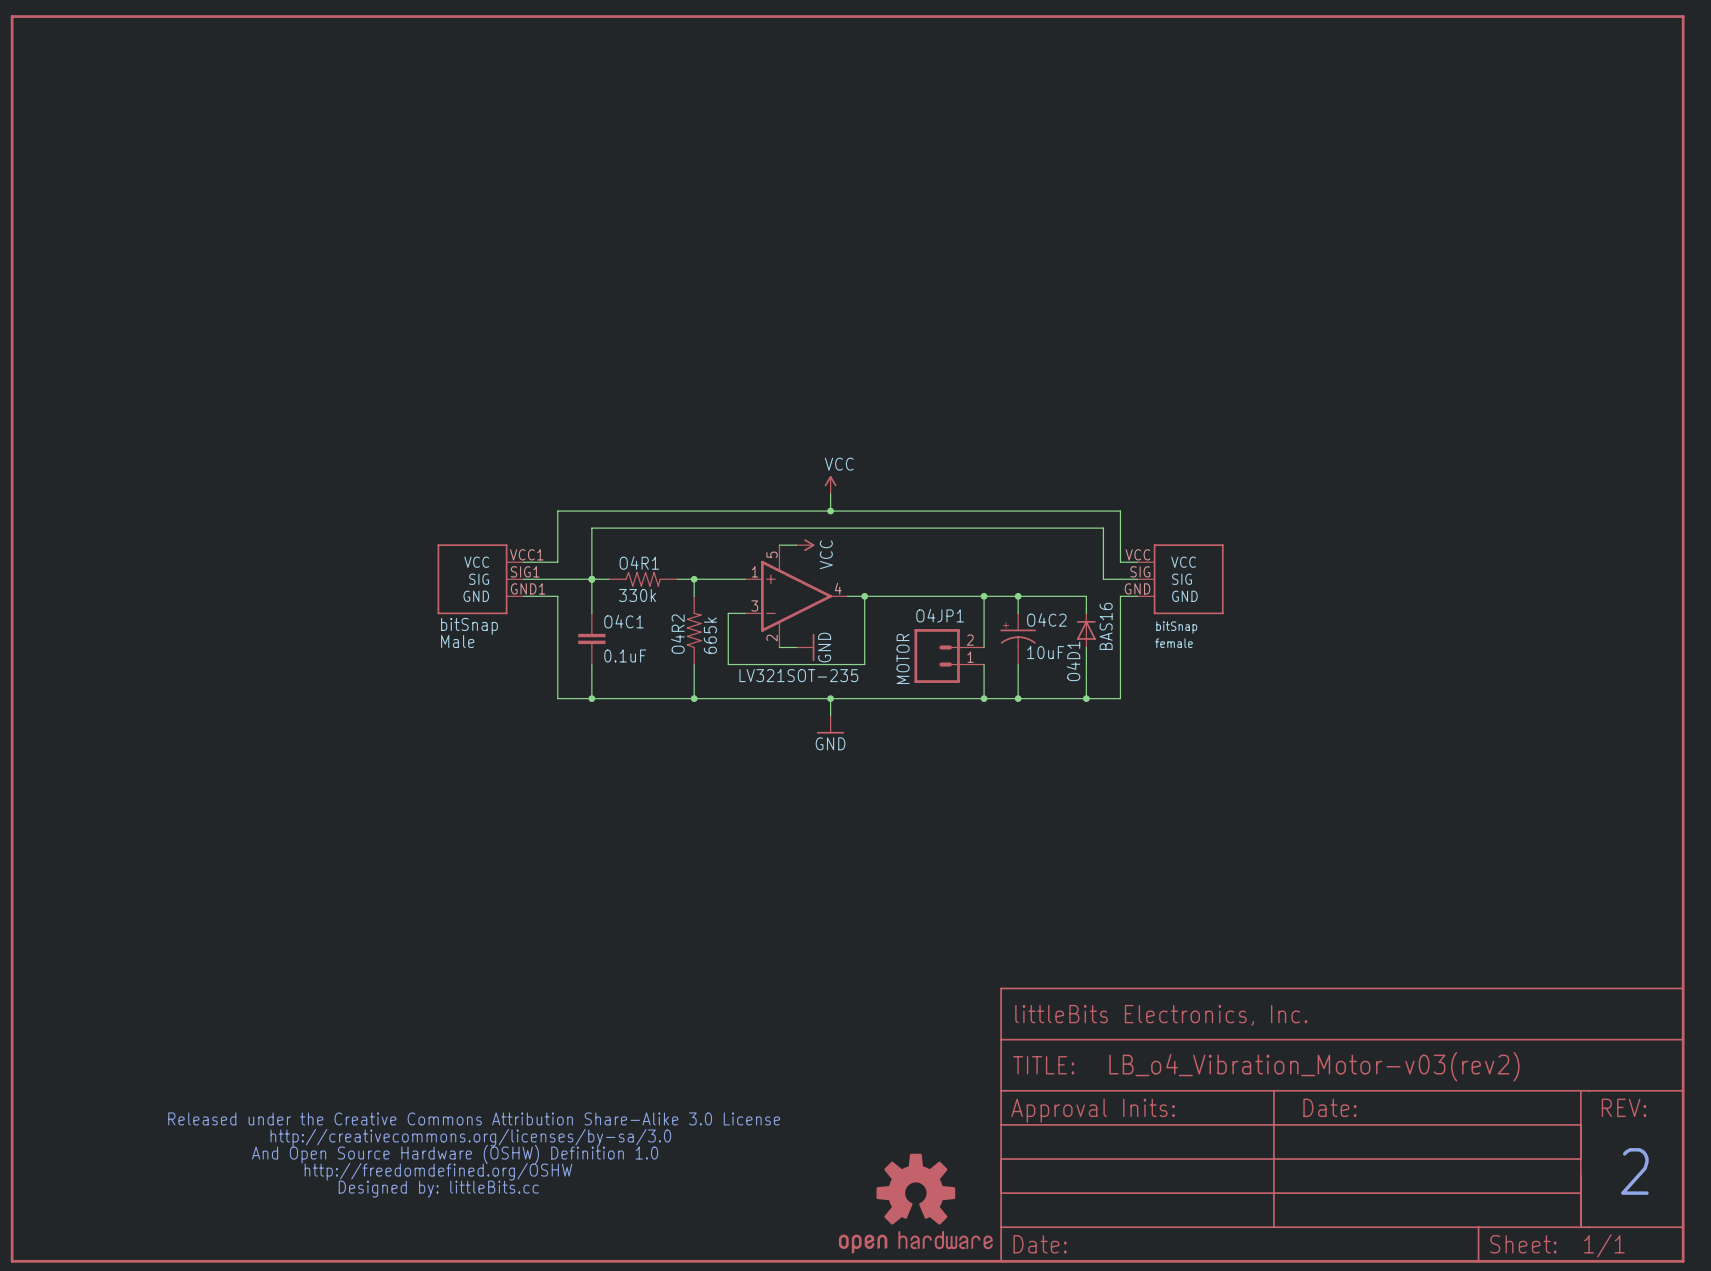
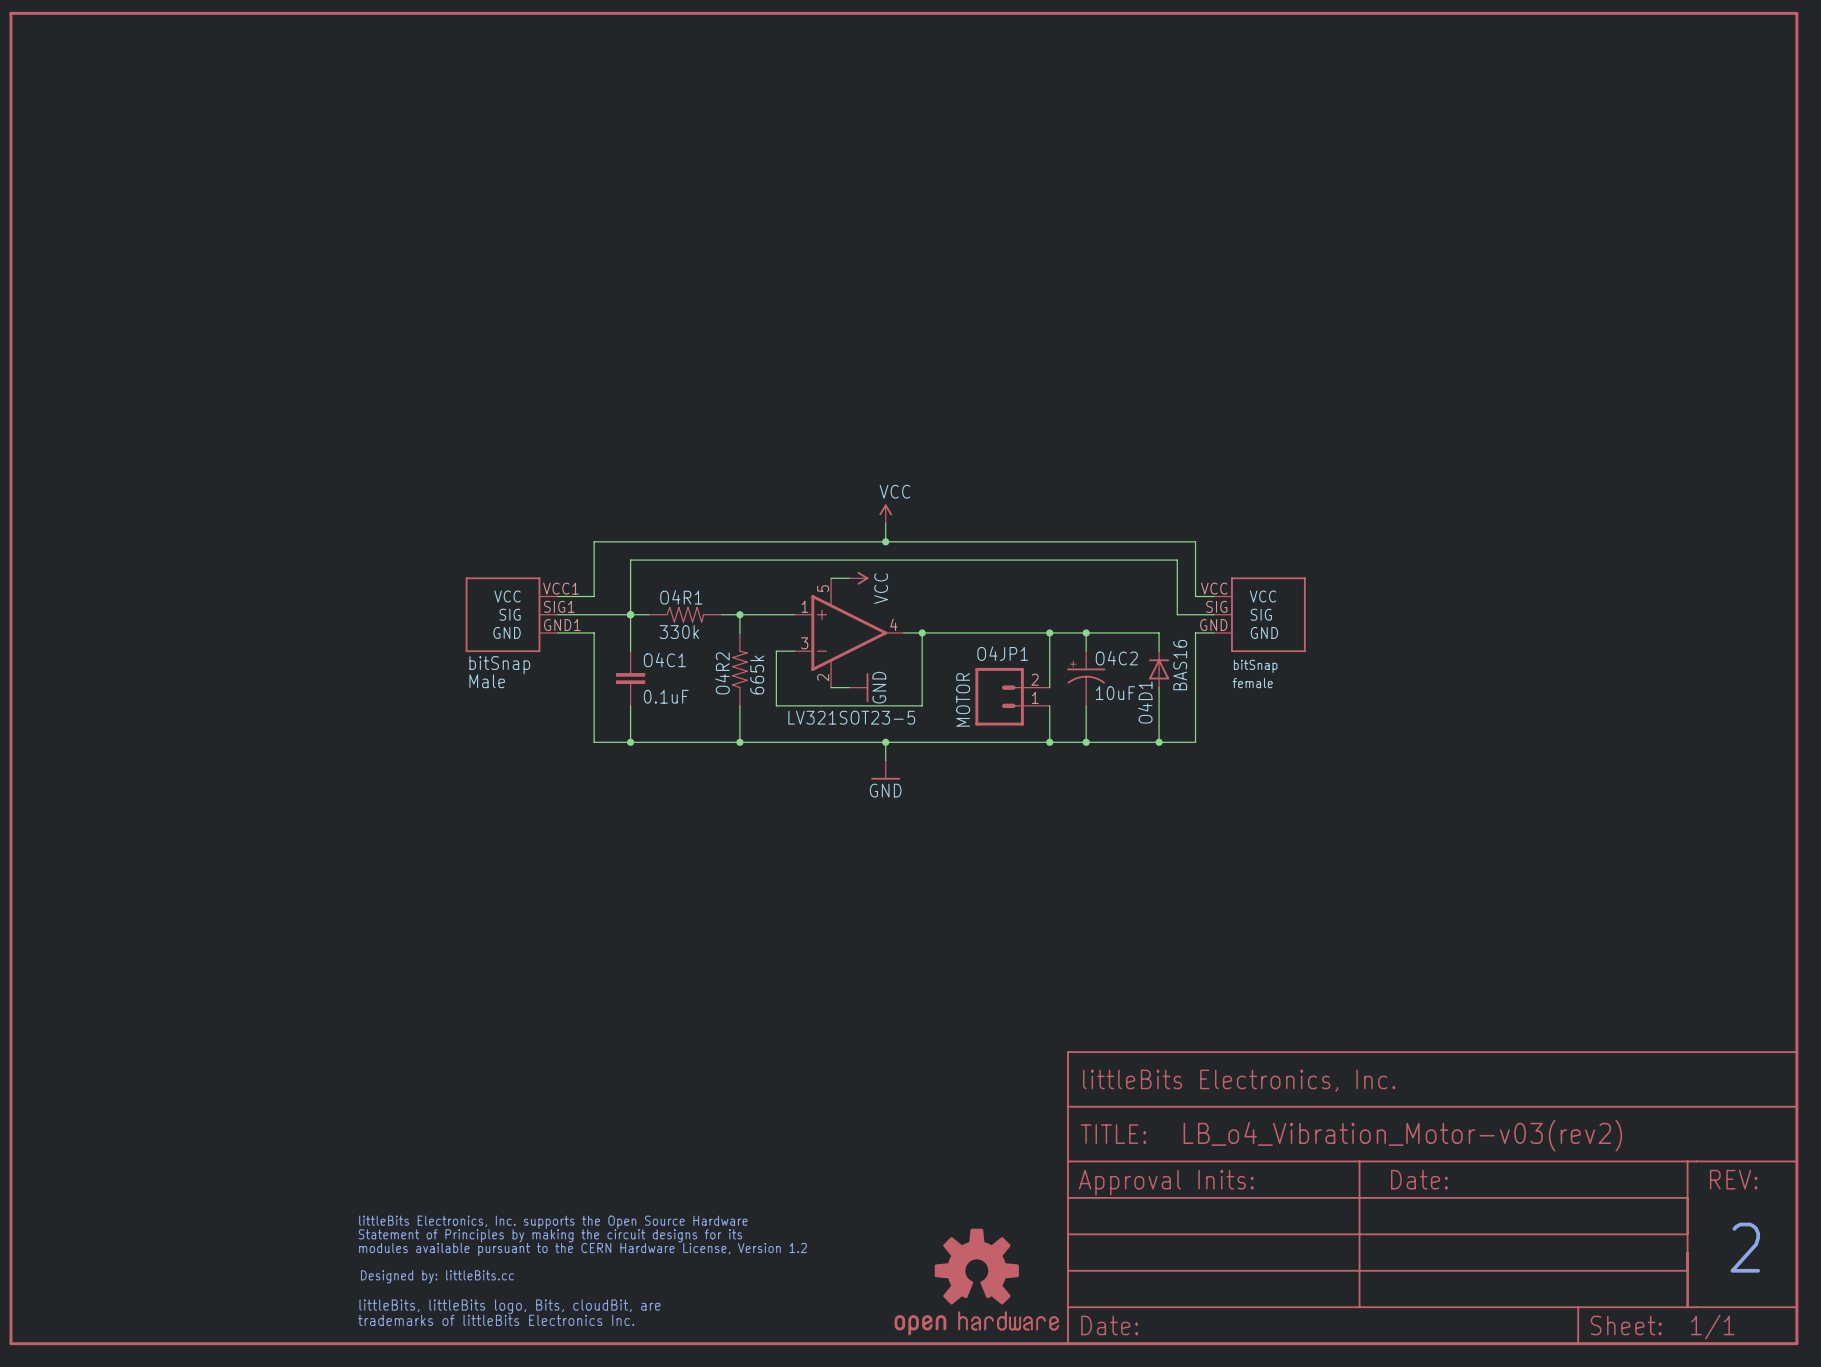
part value: LV321SOT-235 (798, 675) -> LV321SOT23-5 (851, 717)
part: (474, 1155) -> none
part: none -> (582, 1270)

